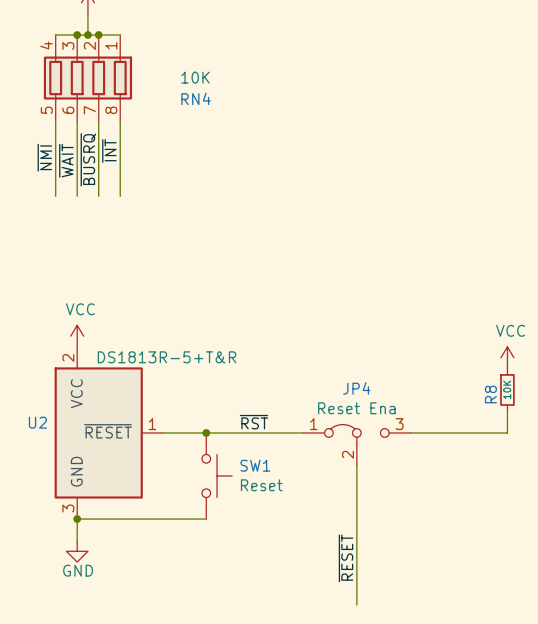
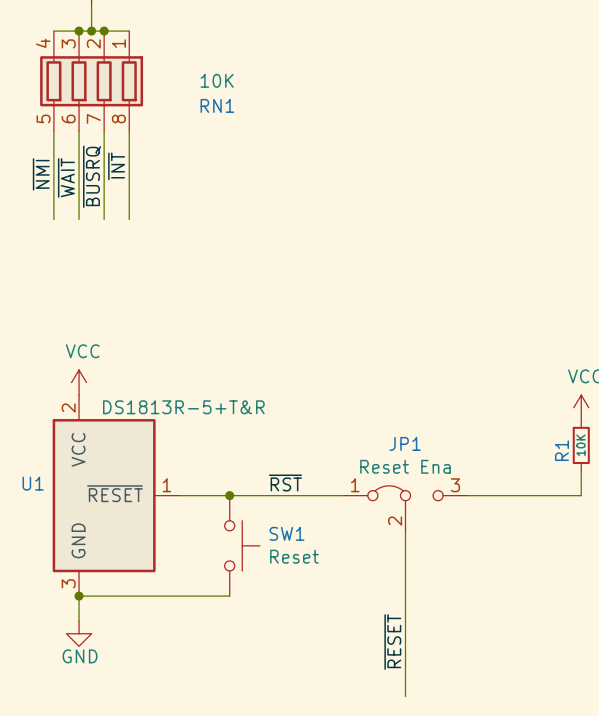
RN4 name: RN4 (196, 98) -> RN1 (217, 105)
JP4 name: JP4 (356, 388) -> JP1 (405, 443)
R8 name: R8 (490, 394) -> R1 (561, 450)
U2 name: U2 (37, 422) -> U1 (33, 483)

